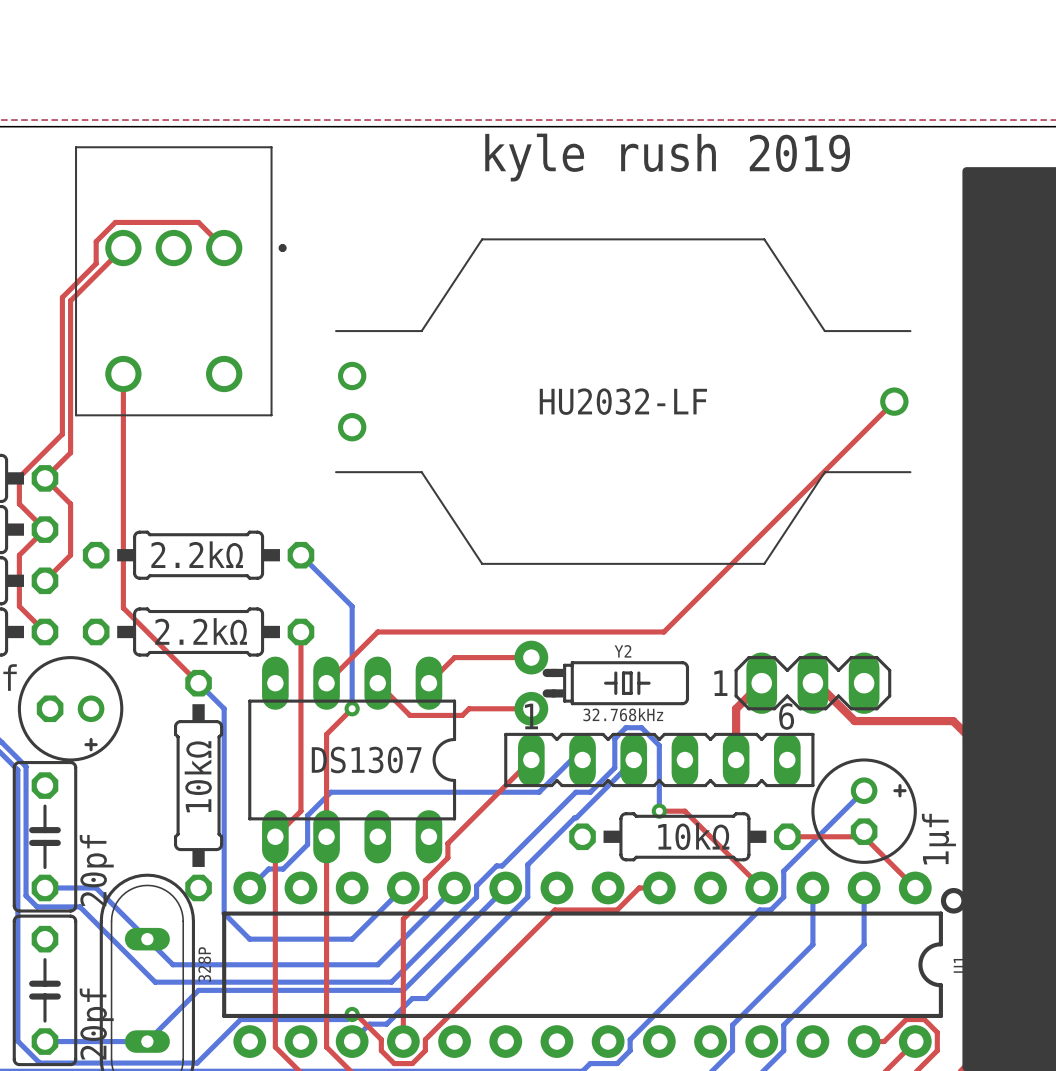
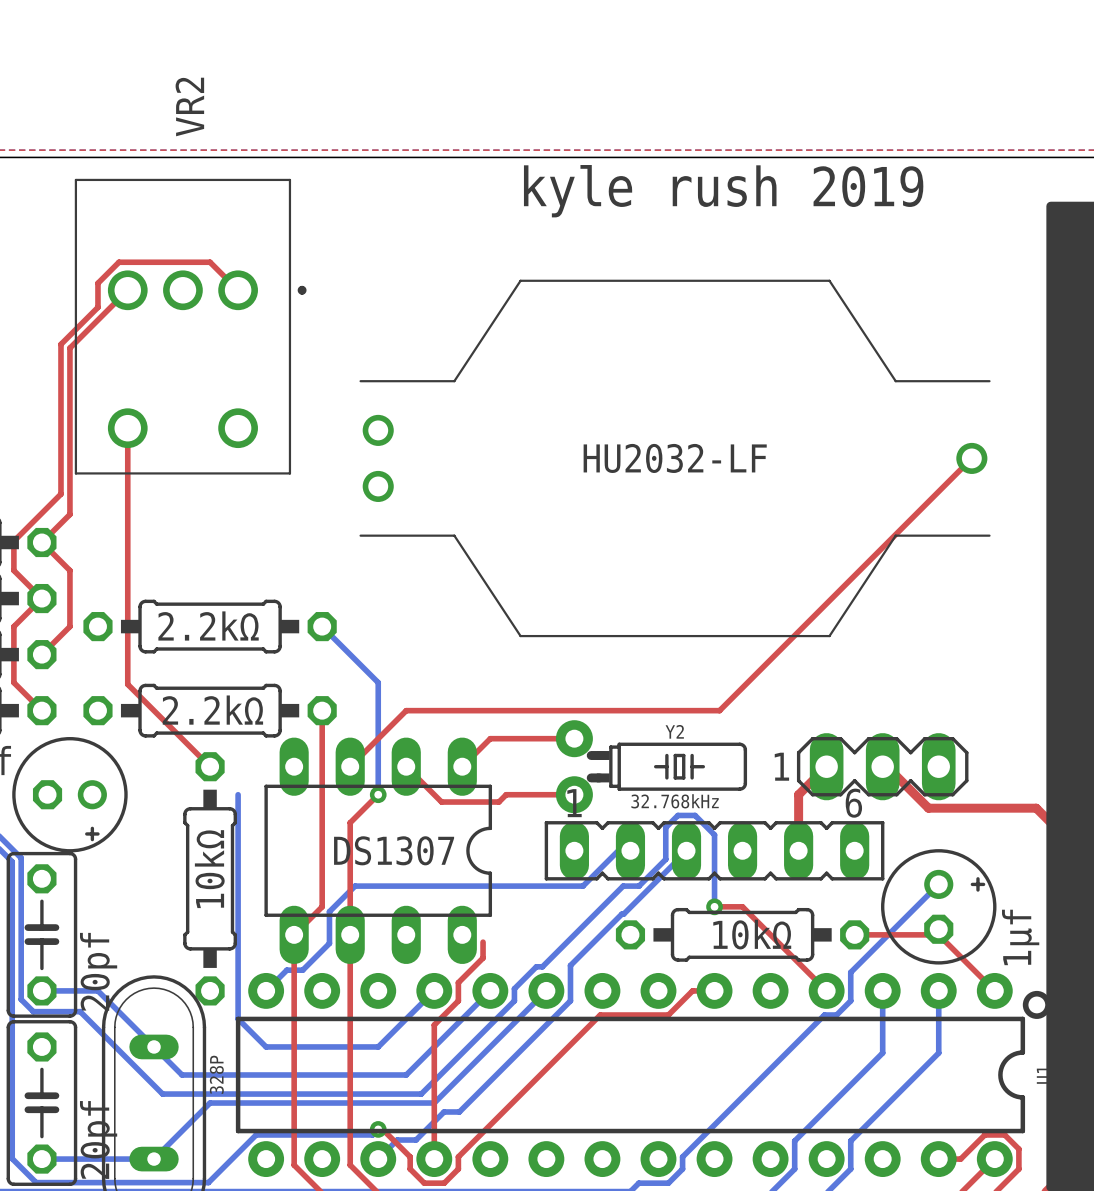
VR2 name: none -> VR2 (189, 107)
bottom track: (198, 683) (224, 708) -> none
top track: (531, 759) (447, 843) -> none

